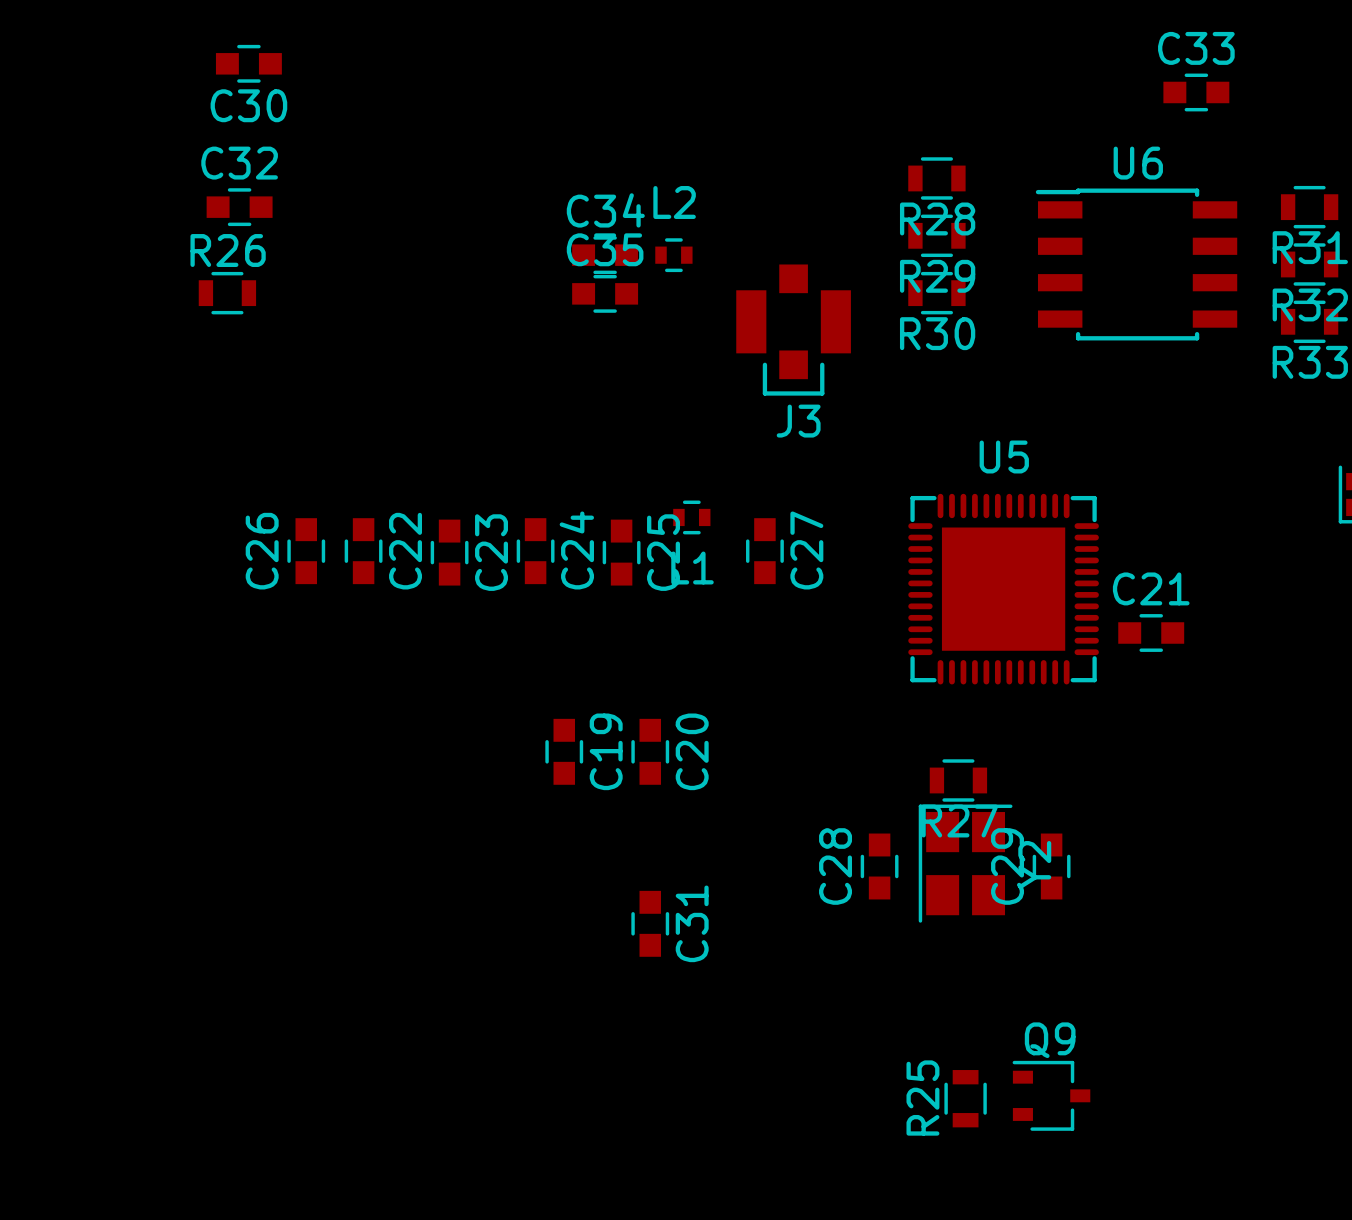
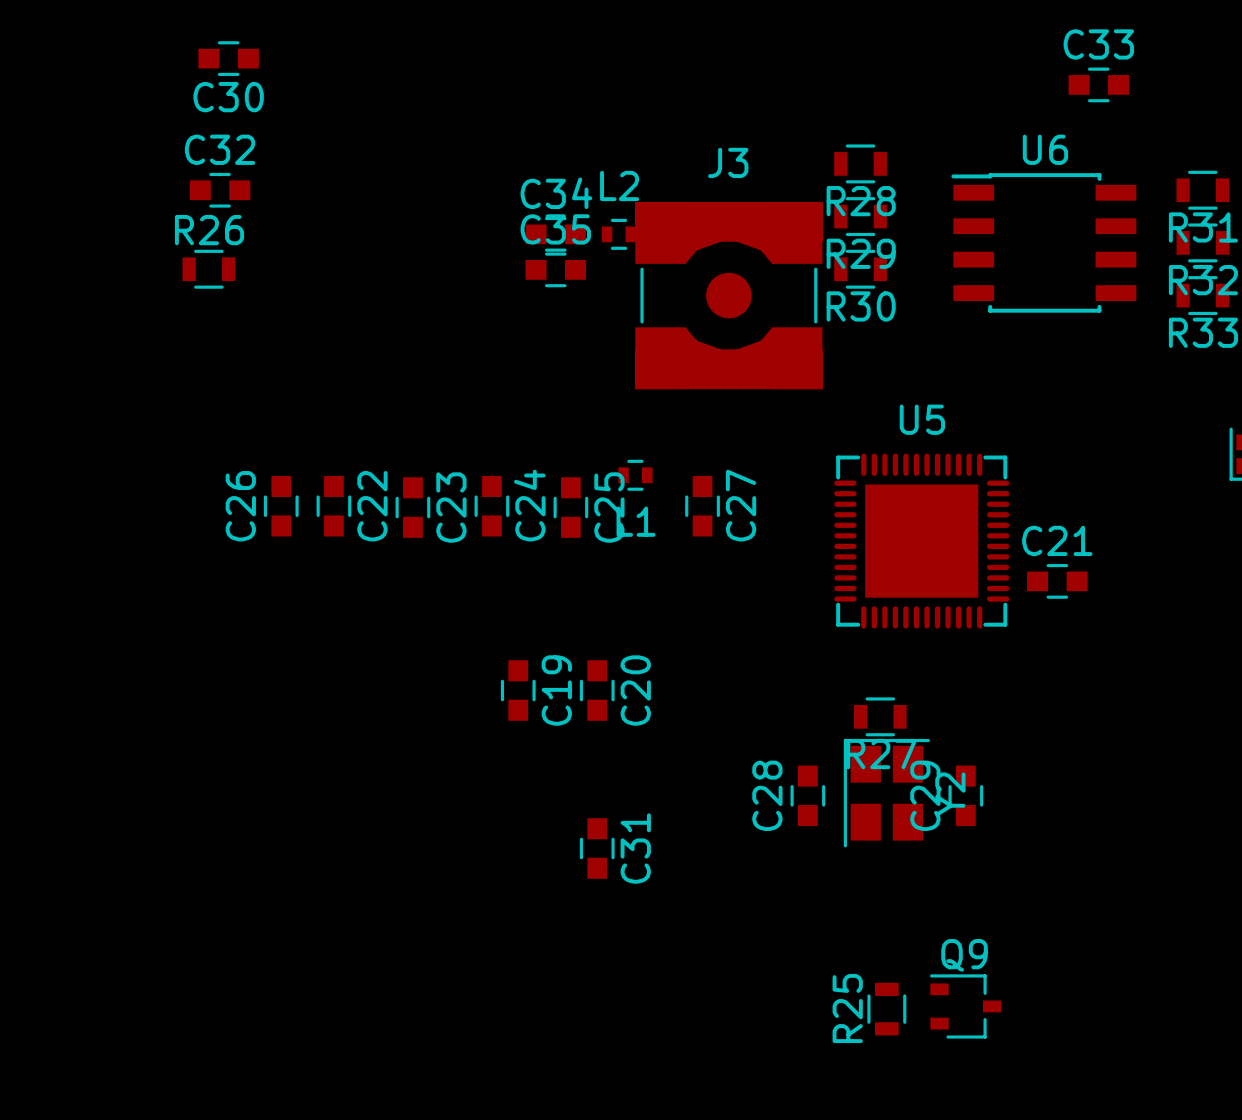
J3 footprint: [736, 264, 851, 396] -> [635, 201, 823, 390]
J3 name position: J3 (798, 421) -> J3 (728, 162)

